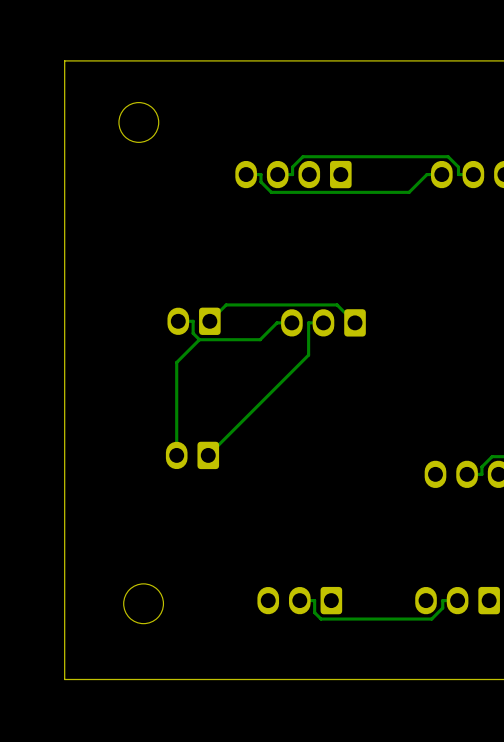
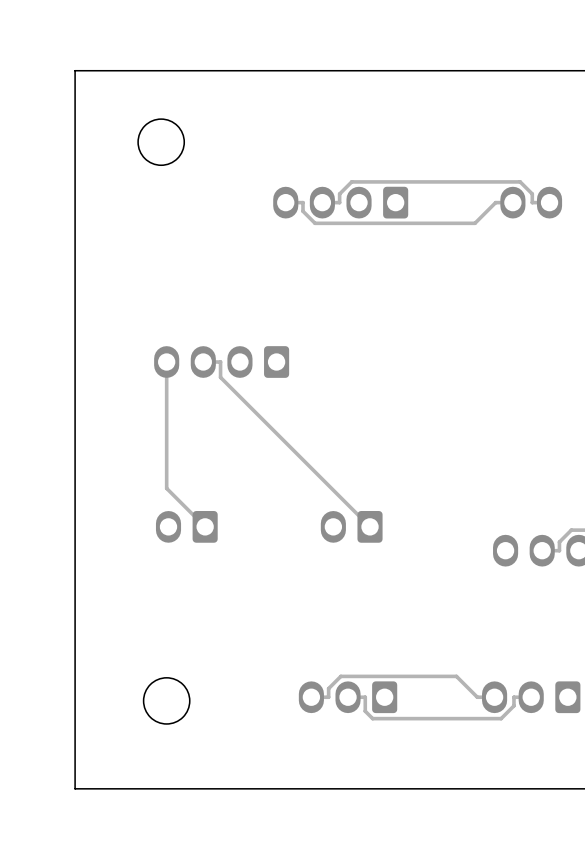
part footprint: [167, 307, 221, 335] -> [154, 346, 290, 378]
track: none -> (166, 362) (166, 488) (205, 526)
track: none -> (203, 362) (220, 362) (220, 377) (370, 526)
track: (178, 321) (193, 321) (193, 333) (199, 339) -> none
track: (209, 321) (226, 304) (337, 304) (355, 322) -> none
track: (291, 322) (277, 322) (260, 339) (199, 339) -> none
track: (323, 322) (308, 322) (308, 355) (208, 455) -> none
part: (323, 322) -> none
track: (199, 339) (176, 362) (176, 455) -> none
part: none -> (351, 526)
part position: (192, 455) -> (186, 526)
track: none -> (494, 697) (477, 697) (456, 676) (340, 676) (328, 688) (328, 697) (311, 697)

